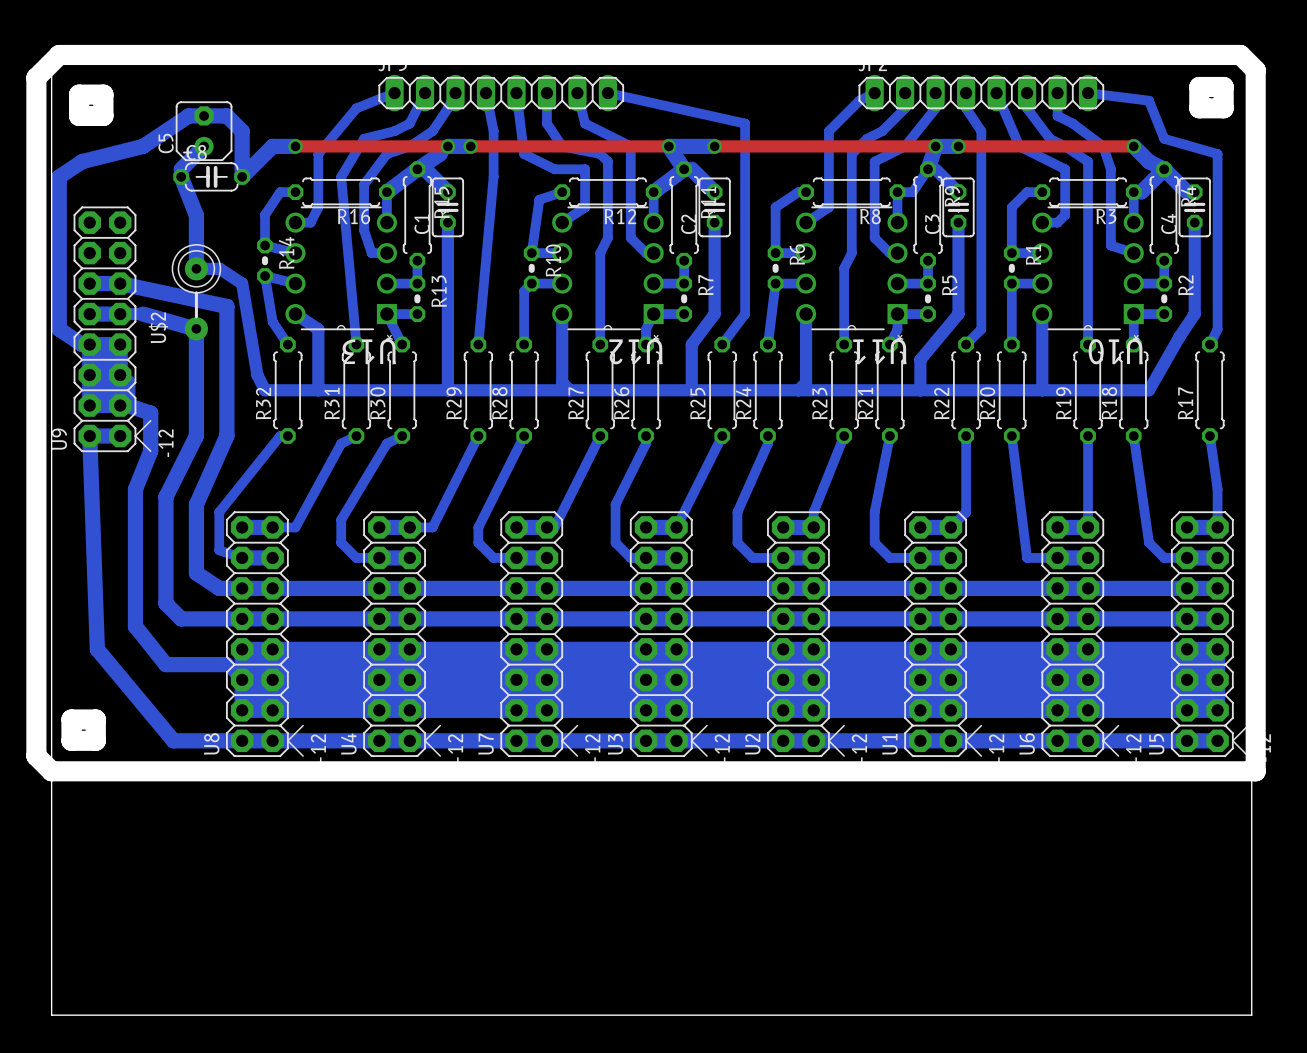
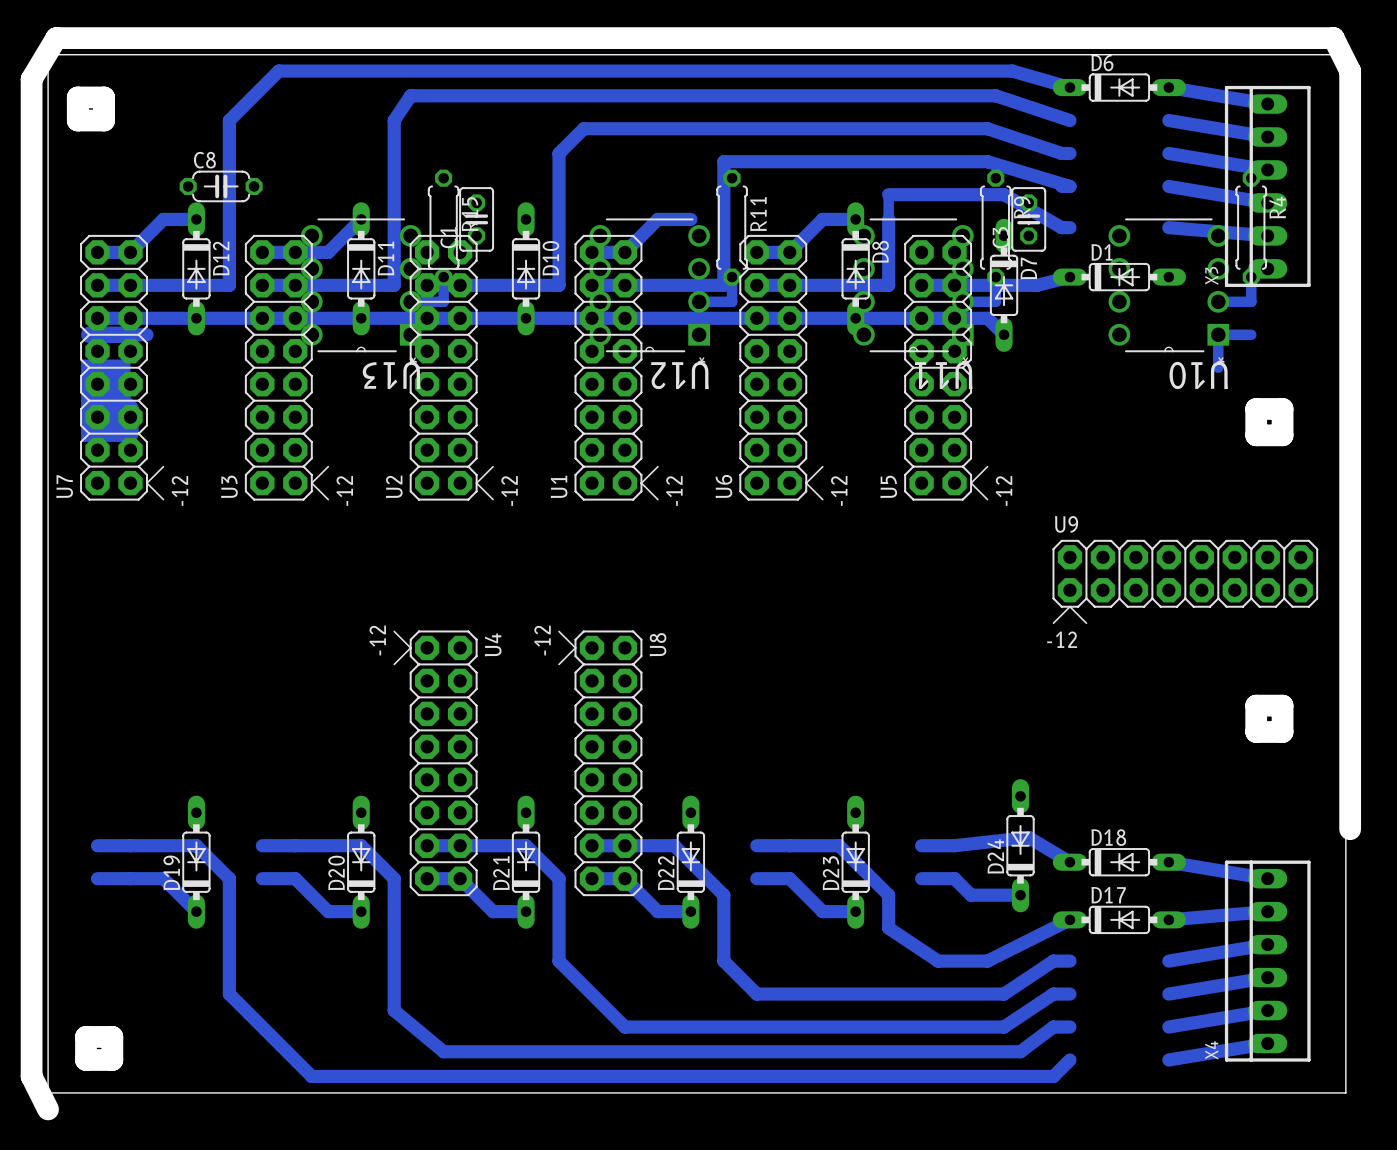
board edge: (1255, 70) (1240, 54) (59, 54) (36, 77) -> (1350, 71) (1333, 38) (56, 38) (31, 79)
bottom track: none -> (1069, 87) (1012, 71) (278, 71) (229, 120) (229, 285) (97, 285)
D6: none -> (1119, 87)
bottom track: none -> (1168, 87) (1267, 104)
board edge: (1199, 86) (1223, 86) (1223, 108) (1199, 108) (1199, 86) -> none
bottom track: (394, 93) (356, 108) (318, 154) (318, 207) (310, 222) (295, 222) -> none
bottom track: (425, 93) (409, 123) (394, 131) (364, 138) (341, 176) (356, 344) -> none
bottom track: (455, 93) (432, 131) (409, 146) (386, 154) (364, 184) (364, 230) (371, 253) (386, 253) -> none
bottom track: (486, 93) (493, 131) (493, 176) (478, 344) -> none
part: (501, 93) -> none
bottom track: (516, 93) (524, 154) (554, 169) (585, 169) (585, 207) (562, 222) -> none
bottom track: (546, 93) (546, 123) (562, 146) (600, 154) (607, 161) (607, 237) (600, 253) (600, 344) -> none
bottom track: (577, 93) (585, 123) (630, 146) (630, 237) (646, 253) (653, 253) -> none
bottom track: (607, 93) (745, 123) (745, 314) (722, 344) -> none
bottom track: (874, 93) (859, 100) (828, 131) (828, 184) -> (1069, 227) (1061, 227) (1004, 194) (888, 194)
bottom track: (905, 93) (905, 108) (882, 131) (867, 138) (851, 154) (851, 253) (844, 268) (844, 344) -> none
bottom track: (935, 93) (935, 108) (905, 146) (874, 161) (874, 237) (889, 253) (897, 253) -> none
bottom track: (966, 93) (966, 108) (981, 131) (981, 329) (966, 344) -> none
part: (981, 93) -> none
bottom track: (996, 93) (1019, 146) (1065, 169) (1065, 215) (1057, 222) (1042, 222) -> none
bottom track: (1027, 93) (1027, 108) (1049, 138) (1088, 161) (1088, 344) -> none
bottom track: (1057, 93) (1057, 115) (1072, 123) (1103, 146) (1110, 169) (1110, 245) (1133, 253) -> none
bottom track: (1088, 93) (1149, 100) (1164, 138) (1217, 154) (1217, 329) (1209, 344) -> none
bottom track: none -> (1069, 120) (995, 95) (410, 95) (394, 120) (394, 285) (262, 285)
bottom track: none -> (1168, 120) (1267, 137)
C5: (204, 131) -> none
bottom track: (204, 146) (181, 169) (181, 176) (196, 215) (196, 268) (219, 268) (242, 283) (257, 375) (265, 390) (1149, 390) (1194, 314) (1194, 222) -> none
bottom track: (295, 146) (272, 146) (242, 176) (242, 131) (226, 115) (188, 115) (143, 146) (82, 161) (59, 176) (59, 329) (82, 344) (120, 344) (120, 375) (89, 375) -> none
top track: (295, 146) (447, 146) -> none
via: (295, 146) -> none
via: (447, 146) -> none
bottom track: (470, 146) (447, 146) (440, 154) (417, 169) -> none
top track: (470, 146) (668, 146) -> none
via: (470, 146) -> none
via: (668, 146) -> none
bottom track: (714, 146) (668, 146) (684, 169) -> none
top track: (714, 146) (935, 146) -> none
via: (714, 146) -> none
via: (935, 146) -> none
bottom track: (958, 146) (935, 146) (928, 169) -> none
top track: (958, 146) (1133, 146) -> none
via: (958, 146) -> none
bottom track: none -> (1069, 153) (1061, 153) (987, 128) (583, 128) (559, 153) (559, 285) (427, 285)
bottom track: none -> (1168, 153) (1267, 169)
bottom track: (1133, 146) (1149, 161) (1164, 169) -> none
via: (1133, 146) -> none
bottom track: (417, 169) (425, 169) (447, 192) -> none
bottom track: (417, 169) (386, 192) (386, 222) -> none
bottom track: (684, 169) (691, 169) (714, 192) -> none
bottom track: (684, 169) (653, 192) (653, 222) -> none
bottom track: (928, 169) (912, 192) (897, 192) (897, 222) -> none
bottom track: (928, 169) (935, 169) (958, 192) -> none
bottom track: (1164, 169) (1141, 192) (1133, 192) (1133, 222) -> none
bottom track: (1164, 169) (1187, 192) (1194, 192) -> none
bottom track: none -> (1061, 186) (1069, 186) (987, 161) (723, 161) (723, 285) (591, 285)
bottom track: none -> (1168, 186) (1267, 202)
X3: none -> (1267, 186)
bottom track: (295, 192) (280, 192) (265, 215) (265, 245) (295, 253) -> none
R16: (341, 192) -> none
bottom track: (562, 192) (539, 199) (531, 253) (562, 253) -> none
R12: (607, 192) -> none
bottom track: (806, 192) (798, 192) (775, 207) (775, 253) (806, 253) -> none
R8: (851, 192) -> none
bottom track: (1042, 192) (1027, 192) (1011, 207) (1011, 253) (1042, 253) -> none
R3: (1088, 192) -> none
bottom track: none -> (196, 219) (163, 219) (130, 252) (97, 252)
bottom track: none -> (361, 219) (328, 252) (262, 252)
bottom track: none -> (690, 219) (657, 219) (624, 252) (591, 252)
C2: (714, 207) -> none
bottom track: none -> (855, 219) (822, 219) (789, 252) (756, 252)
bottom track: (828, 207) (806, 222) -> (888, 219) (888, 285) (756, 285)
C4: (1194, 207) -> none
bottom track: none -> (1168, 227) (1267, 235)
bottom track: (447, 222) (447, 390) -> none
bottom track: (714, 222) (714, 314) (691, 344) (691, 390) -> none
bottom track: (958, 222) (958, 314) (920, 359) (920, 390) -> none
D12: none -> (196, 268)
D11: none -> (361, 268)
D10: none -> (526, 268)
D8: none -> (855, 268)
R14: (265, 260) -> none
bottom track: none -> (1069, 277) (1036, 285) (921, 285)
D1: none -> (1119, 277)
R10: (531, 268) -> none
R6: (775, 268) -> none
D7: none -> (1004, 285)
R1: (1011, 268) -> none
bottom track: (89, 283) (120, 283) (226, 306) (226, 436) (196, 504) (196, 573) (219, 588) (1217, 588) -> none
bottom track: (295, 283) (265, 275) (272, 321) (287, 344) -> none
bottom track: (562, 283) (531, 283) (524, 291) (524, 344) -> none
bottom track: (806, 283) (775, 283) (767, 344) -> none
bottom track: (1042, 283) (1011, 283) (1011, 344) -> none
U$2: (196, 292) -> none
bottom track: none -> (97, 318) (987, 318) (1004, 334)
R13: (417, 298) -> none
R7: (684, 298) -> none
R5: (928, 298) -> none
R2: (1164, 298) -> none
bottom track: (295, 314) (318, 329) (318, 390) -> none
bottom track: (417, 314) (386, 314) (402, 344) -> none
bottom track: (562, 314) (562, 382) (569, 390) -> none
bottom track: (684, 314) (653, 314) (646, 329) (646, 344) -> none
bottom track: (806, 314) (806, 382) (798, 390) -> none
bottom track: (928, 314) (897, 314) (897, 329) (889, 344) -> none
bottom track: (1042, 314) (1042, 390) -> none
bottom track: (196, 328) (143, 314) (196, 329) (196, 436) (165, 496) (165, 603) (181, 618) (1217, 618) -> none
U9 rotation: 0° (112, 329) -> 90° clockwise (1185, 581)
U9 position: (112, 329) -> (1185, 581)
board edge: none -> (1256, 408) (1256, 435) (1282, 435) (1282, 408) (1256, 408)
R32: (287, 390) -> none
R31: (356, 390) -> none
R30: (402, 390) -> none
R29: (478, 390) -> none
R28: (524, 390) -> none
R27: (600, 390) -> none
R26: (646, 390) -> none
R25: (722, 390) -> none
R24: (767, 390) -> none
R23: (844, 390) -> none
R21: (889, 390) -> none
R22: (966, 390) -> none
R20: (1011, 390) -> none
R19: (1088, 390) -> none
R18: (1133, 390) -> none
R17: (1209, 390) -> none
bottom track: (89, 405) (127, 405) (150, 413) (150, 451) (135, 489) (135, 626) (165, 664) (226, 664) (242, 679) -> none
bottom track: (120, 436) (89, 436) (97, 649) (173, 740) (1217, 740) -> none
bottom track: (287, 436) (280, 436) (219, 512) (219, 550) (242, 557) (272, 557) -> none
bottom track: (356, 436) (341, 443) (295, 527) (242, 527) -> none
bottom track: (402, 436) (386, 443) (341, 519) (341, 542) (356, 557) (409, 557) -> none
bottom track: (478, 436) (432, 527) (379, 527) -> none
bottom track: (524, 436) (478, 527) (478, 542) (493, 557) (546, 557) -> none
bottom track: (600, 436) (554, 527) (516, 527) -> none
bottom track: (646, 436) (646, 443) (615, 504) (615, 542) (630, 557) (676, 557) -> none
bottom track: (722, 436) (676, 527) (646, 527) -> none
bottom track: (767, 436) (767, 443) (737, 512) (737, 542) (752, 557) (813, 557) -> none
bottom track: (844, 436) (813, 512) (813, 527) (783, 527) -> none
bottom track: (889, 436) (874, 512) (874, 542) (889, 557) (950, 557) -> none
bottom track: (966, 436) (966, 512) (950, 527) (920, 527) -> none
bottom track: (1011, 436) (1027, 557) (1088, 557) -> none
bottom track: (1088, 436) (1088, 527) (1057, 527) -> none
bottom track: (1133, 436) (1149, 542) (1164, 557) (1217, 557) -> none
bottom track: (1209, 436) (1217, 489) (1217, 527) (1187, 527) -> none
U8 footprint: [225, 511, 304, 757] -> [558, 630, 643, 897]
U4 footprint: [363, 511, 442, 757] -> [393, 630, 478, 897]
U7 position: (539, 634) -> (122, 367)
U3 position: (668, 634) -> (286, 367)
U2 position: (805, 634) -> (451, 367)
U1 position: (943, 634) -> (616, 367)
U6 position: (1080, 634) -> (781, 367)
U5 position: (1209, 634) -> (946, 367)
drawing: [234, 641, 1226, 718] -> none
board edge: none -> (1256, 705) (1256, 732) (1282, 732) (1282, 705) (1256, 705)
board edge: (71, 719) (95, 719) (95, 740) (71, 740) (71, 719) -> (85, 1036) (112, 1036) (112, 1059) (85, 1059) (85, 1036)
U8 name position: U8 (211, 743) -> U8 (658, 644)
U4 name position: U4 (348, 744) -> U4 (493, 644)
board edge: (36, 756) (51, 771) (1255, 771) -> (31, 812) (31, 1076) (48, 1109)
bottom track: none -> (97, 845) (196, 845) (229, 878) (229, 994) (311, 1076) (1053, 1076) (1069, 1059)
bottom track: none -> (262, 845) (361, 845) (394, 878) (394, 1010) (443, 1051) (1020, 1051) (1053, 1027) (1069, 1027)
bottom track: none -> (427, 845) (526, 845) (559, 878) (559, 961) (624, 1027) (1004, 1027) (1053, 994) (1069, 994)
bottom track: none -> (591, 845) (674, 845) (723, 895) (723, 961) (756, 994) (1004, 994) (1053, 961) (1069, 961)
bottom track: none -> (756, 845) (839, 845) (888, 895) (888, 928) (938, 961) (987, 961) (1069, 919)
bottom track: none -> (921, 845) (954, 845) (1028, 837) (1069, 862)
D24: none -> (1020, 845)
D19: none -> (196, 862)
D20: none -> (361, 862)
D21: none -> (526, 862)
D22: none -> (690, 862)
D23: none -> (855, 862)
D18: none -> (1119, 862)
bottom track: none -> (1168, 862) (1267, 878)
bottom track: none -> (97, 878) (163, 878) (196, 911)
bottom track: none -> (262, 878) (295, 878) (328, 911) (361, 911)
bottom track: none -> (427, 878) (460, 878) (493, 911) (526, 911)
bottom track: none -> (591, 878) (624, 878) (657, 911) (690, 911)
bottom track: none -> (756, 878) (789, 878) (822, 911) (855, 911)
bottom track: none -> (921, 878) (954, 878) (971, 895) (1020, 895)
bottom track: none -> (1267, 911) (1168, 919)
D17: none -> (1119, 919)
bottom track: none -> (1267, 944) (1168, 961)
X4: none -> (1267, 961)
bottom track: none -> (1267, 977) (1168, 994)
bottom track: none -> (1267, 1010) (1168, 1027)
bottom track: none -> (1267, 1043) (1168, 1059)

